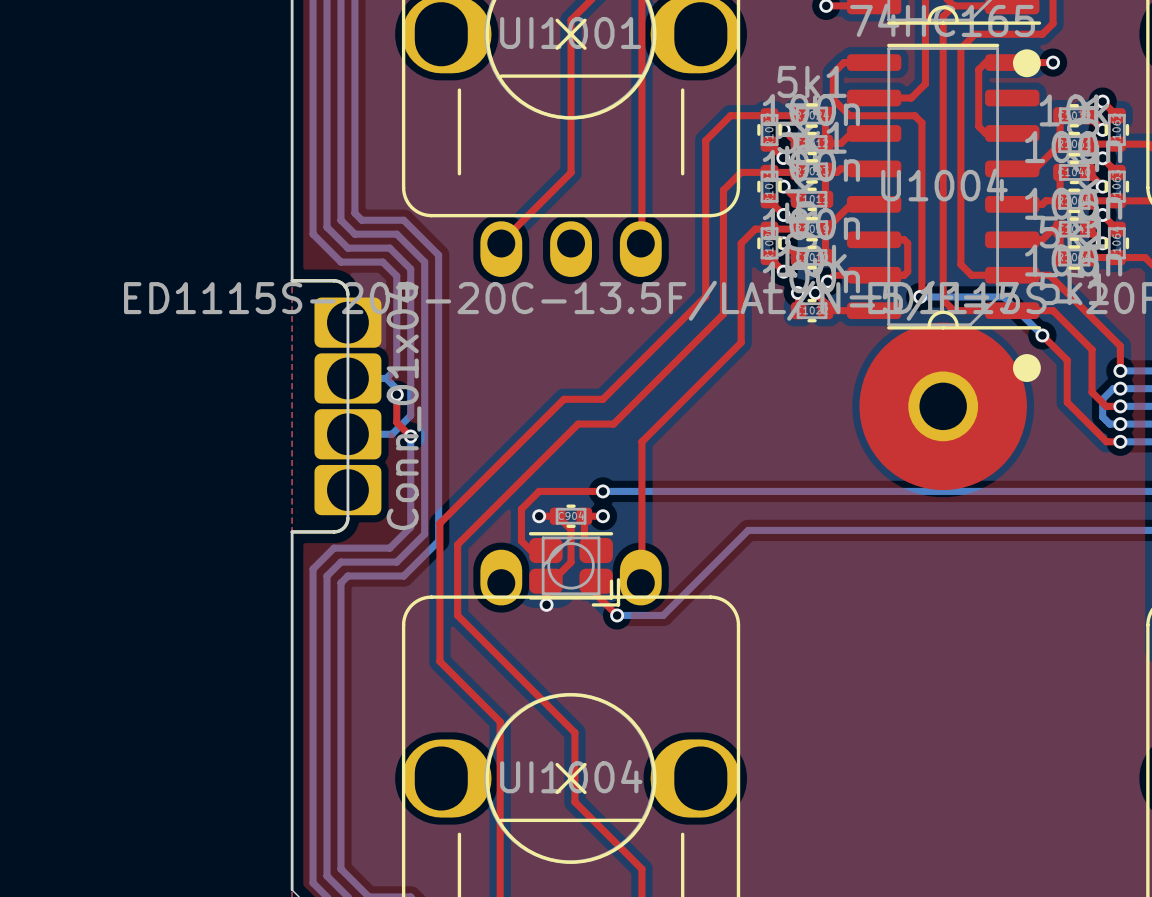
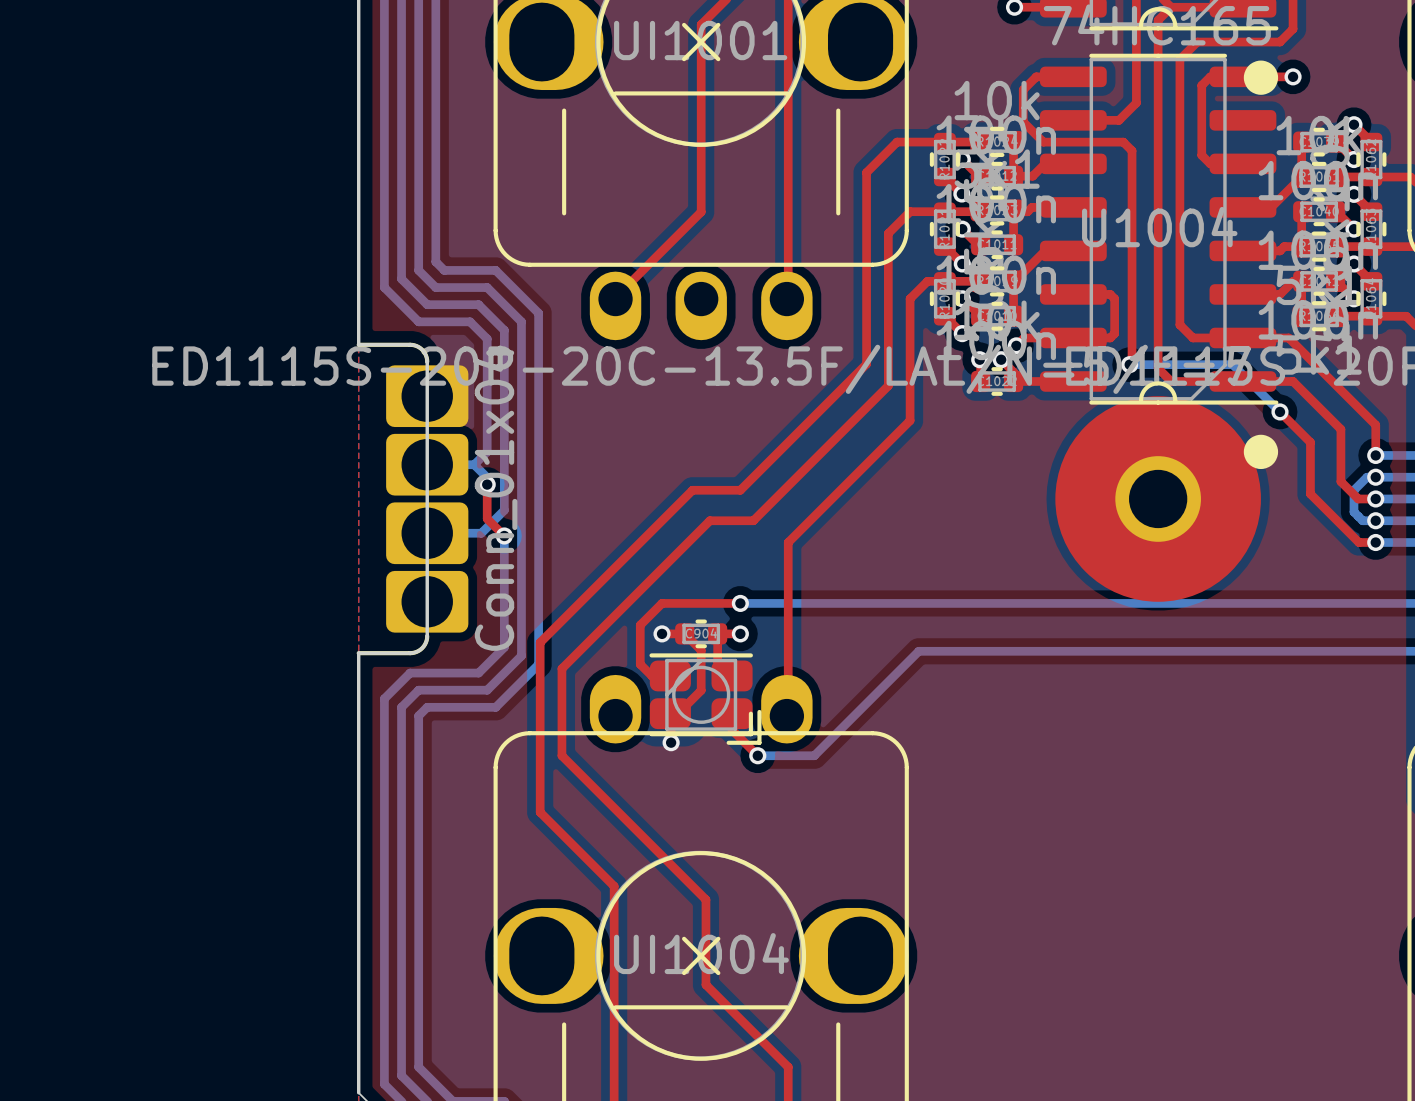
part value: 5k1 (812, 81) -> 10k (997, 100)

